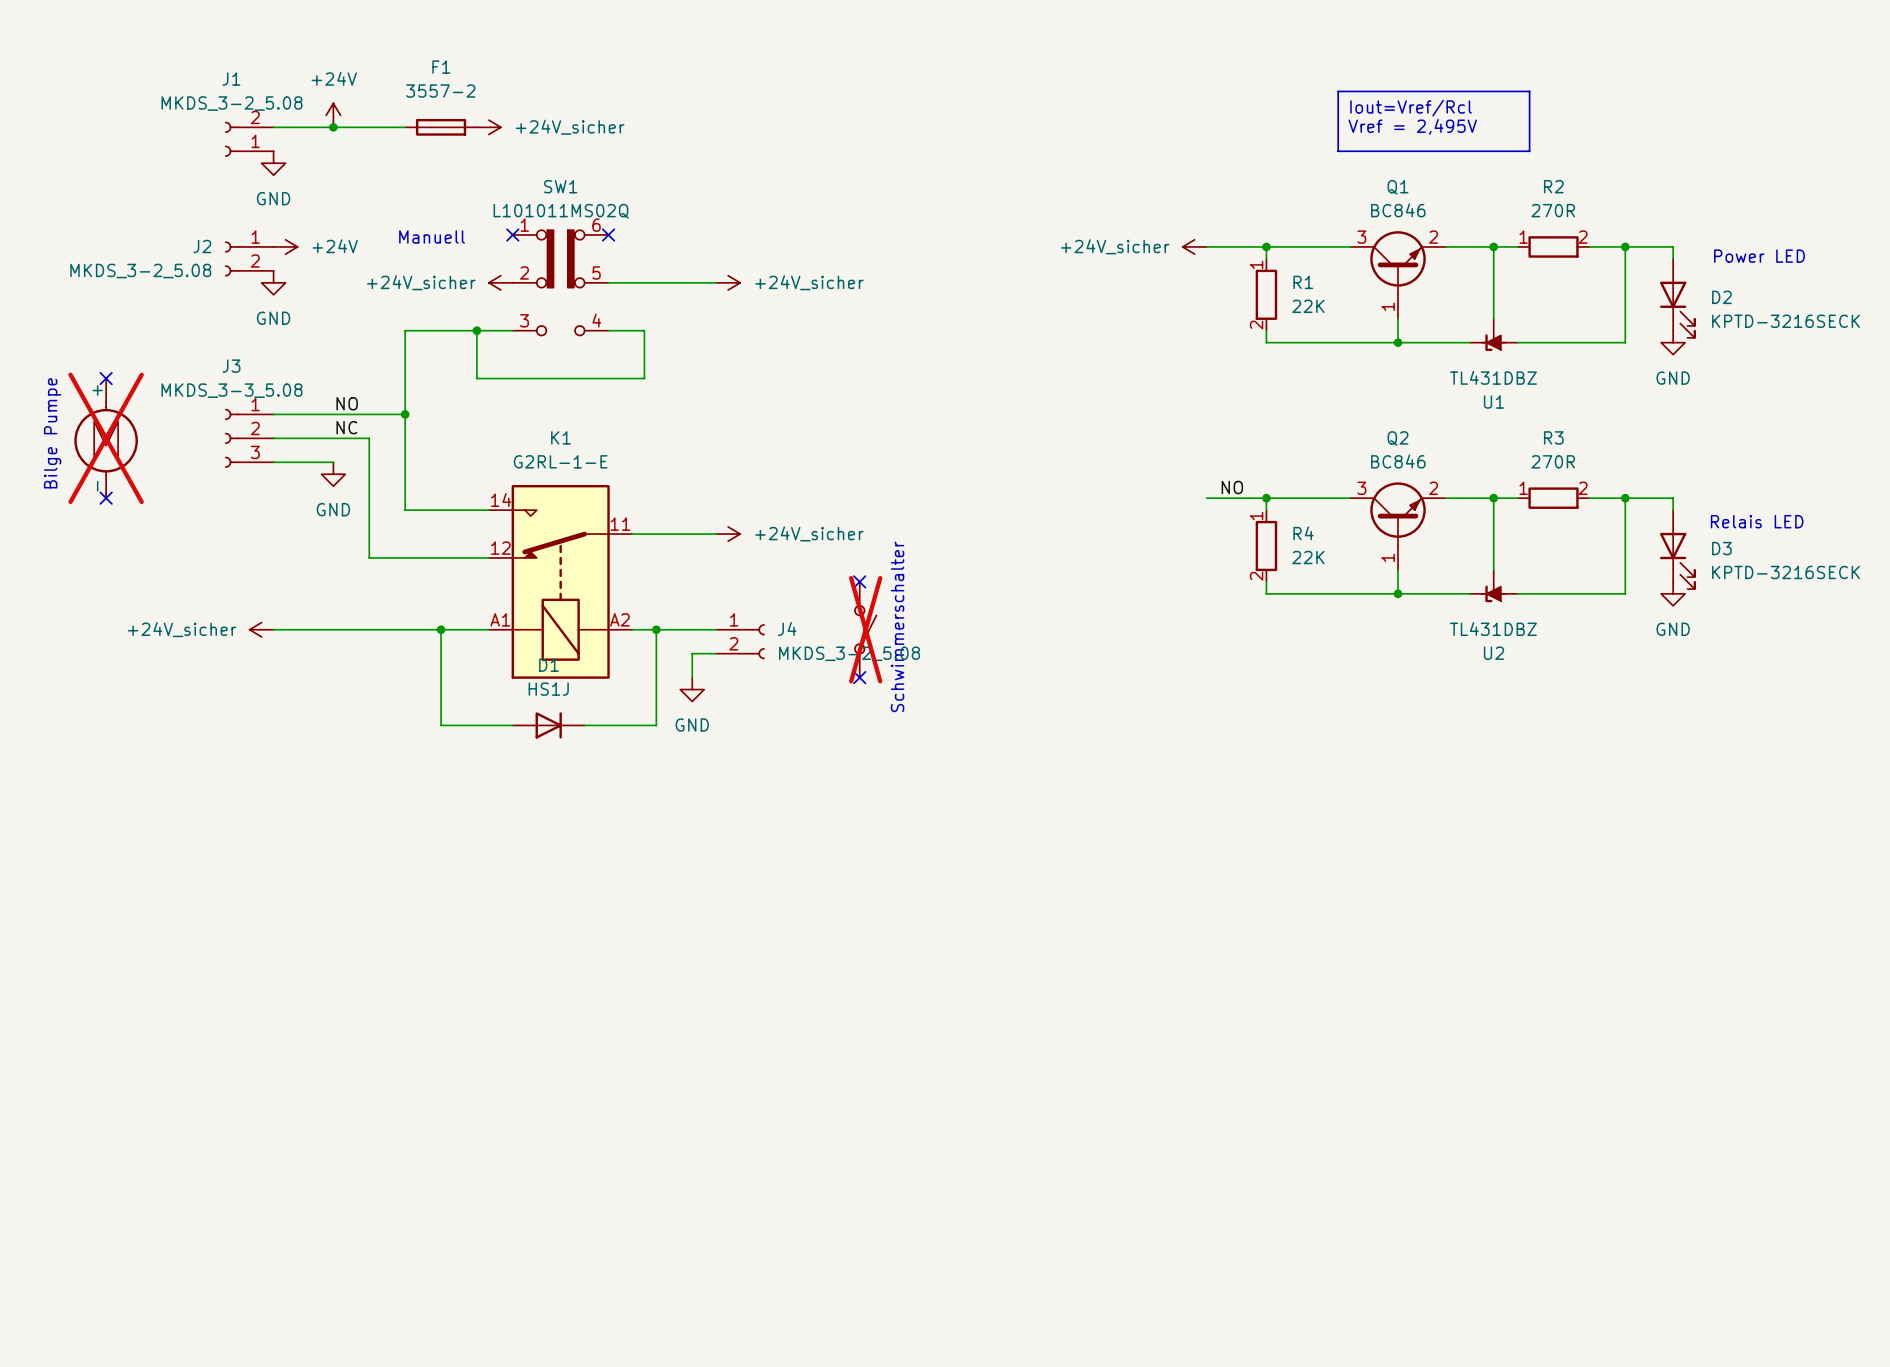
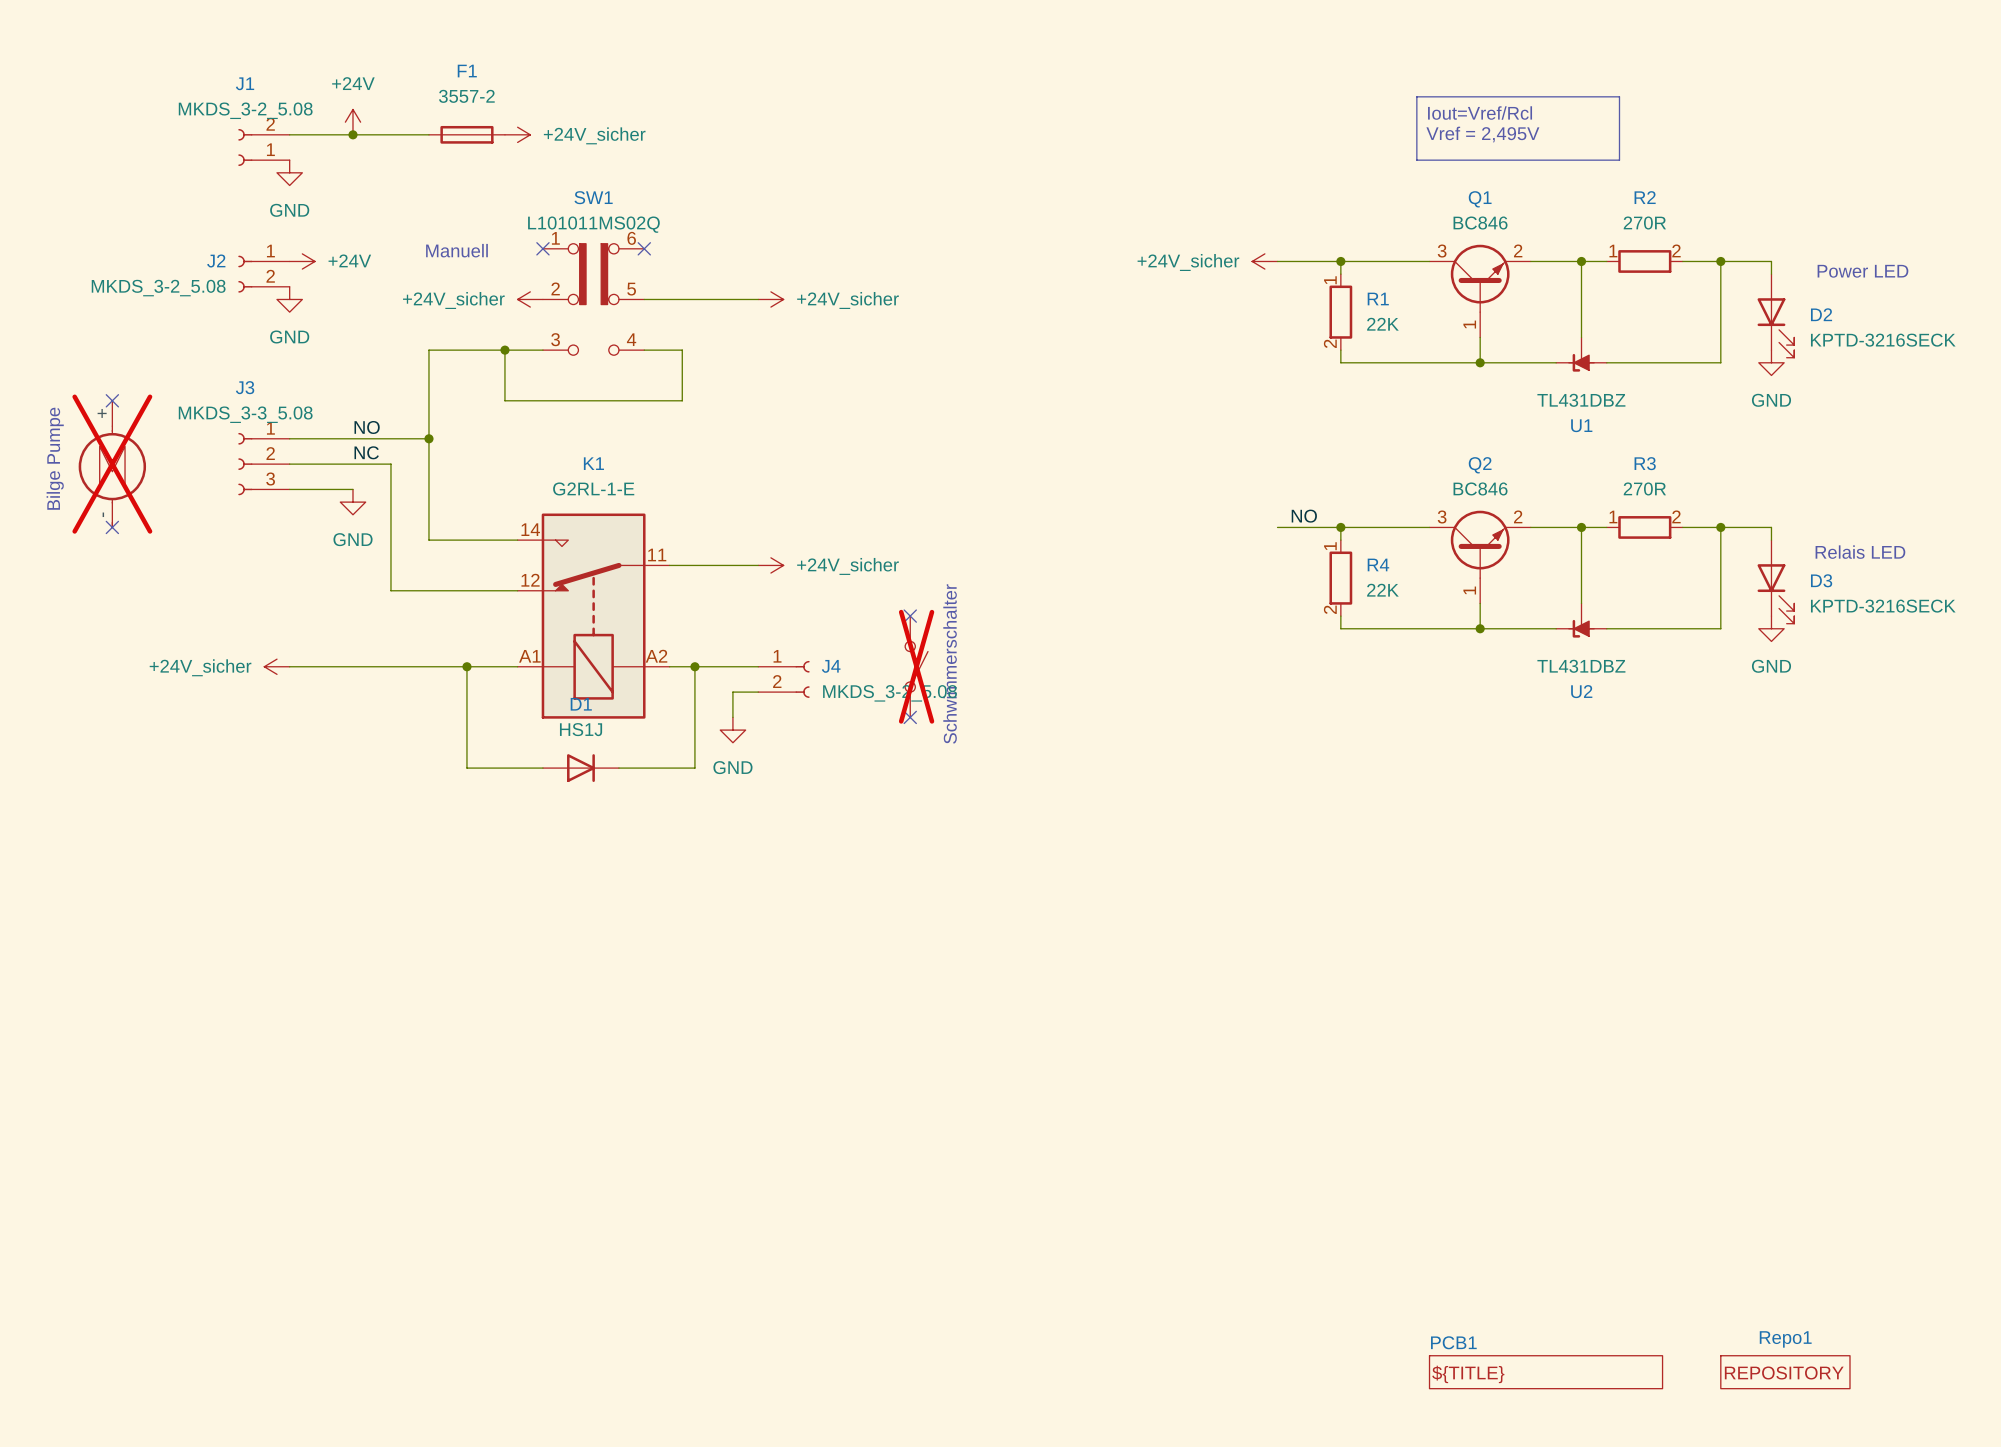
PCB1: none -> (1546, 1372)
Repo1: none -> (1785, 1372)

